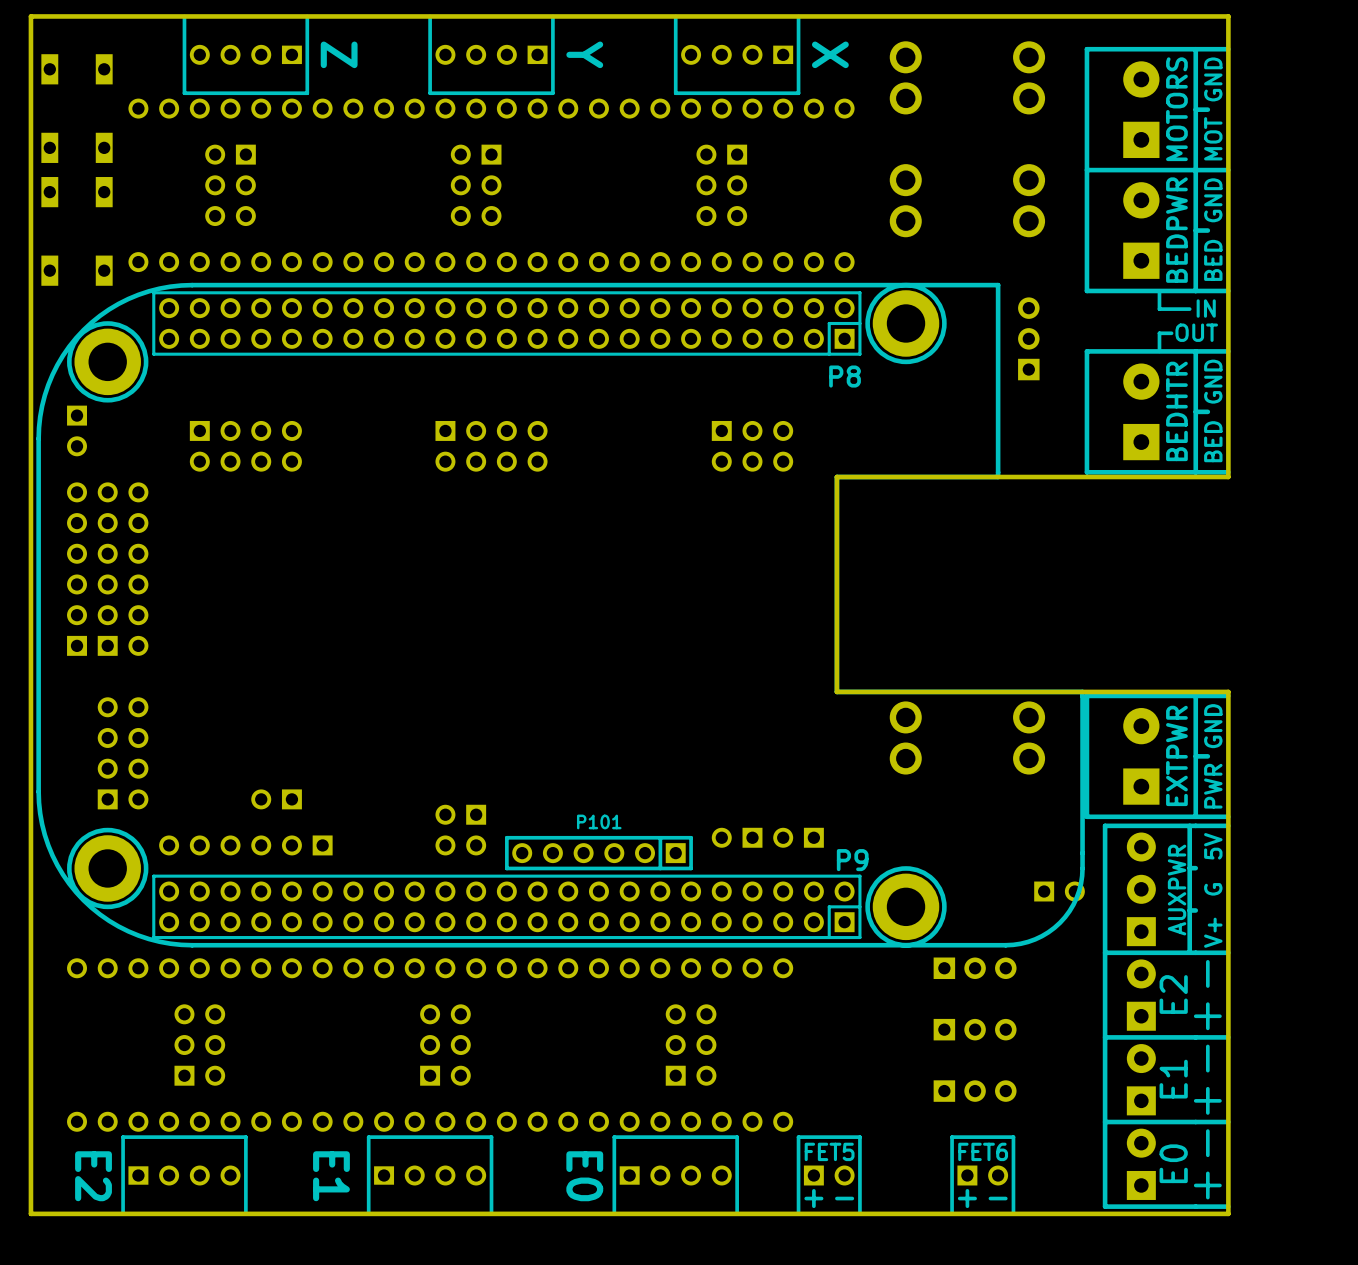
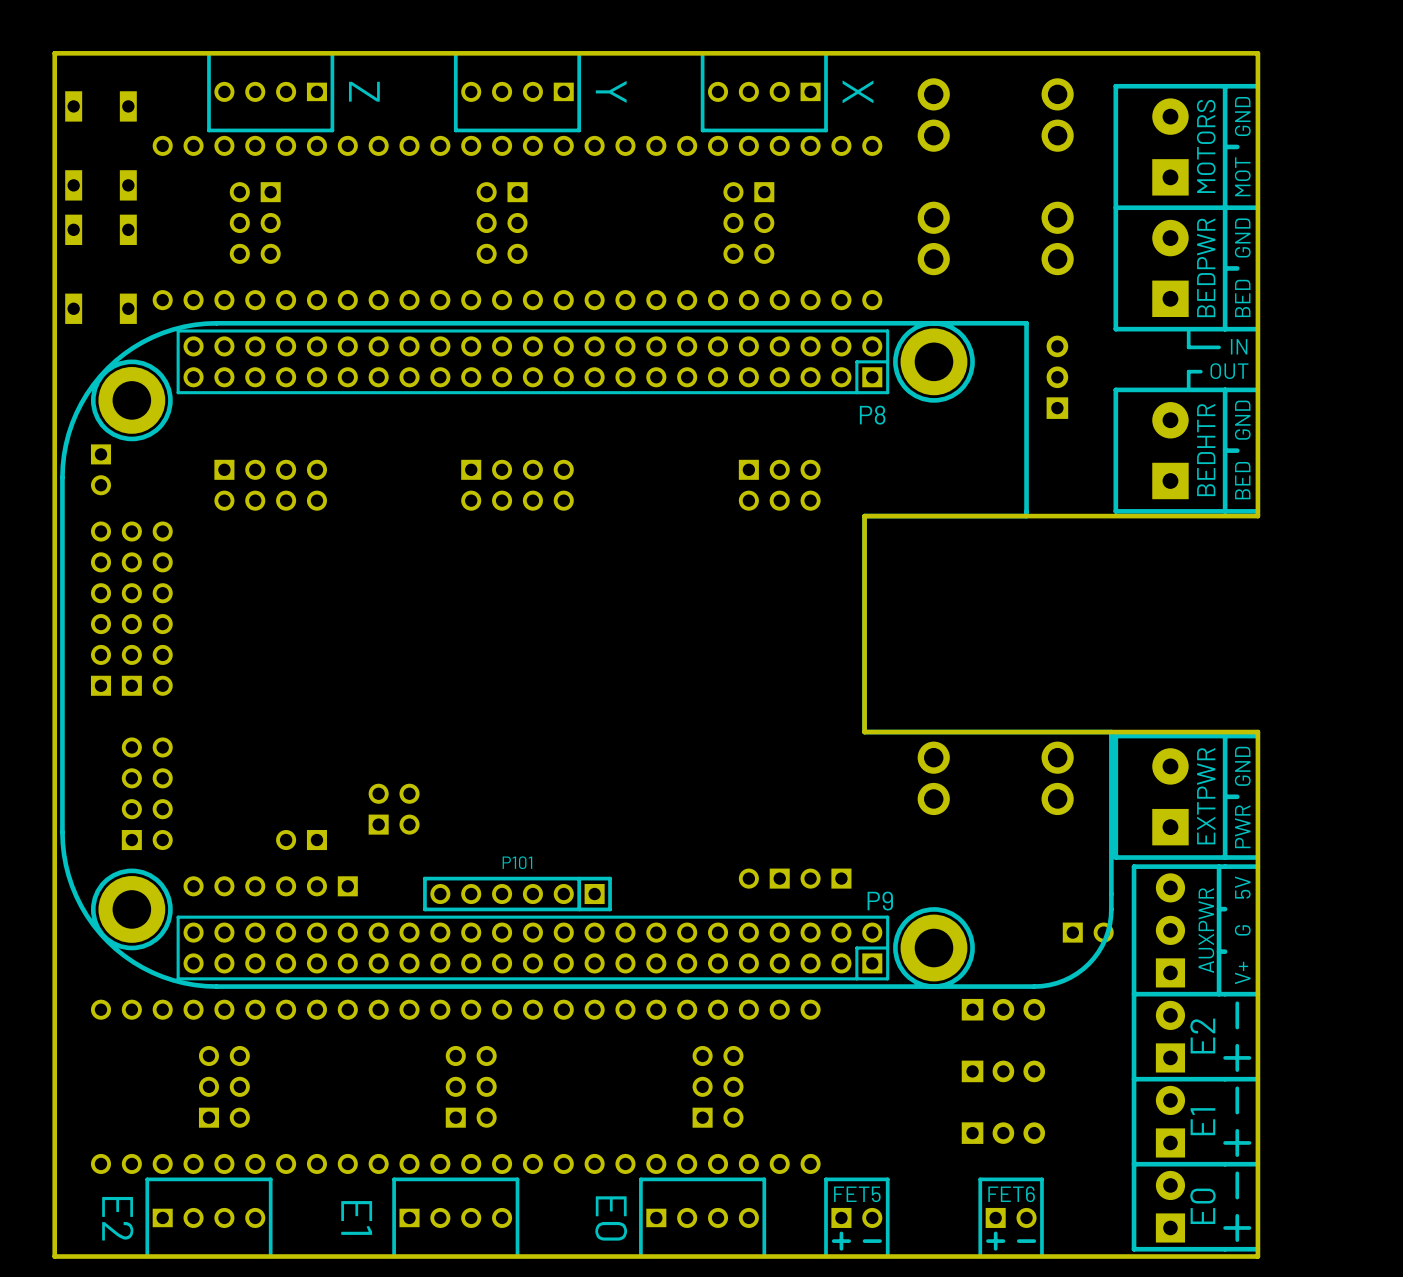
part rotation: 0° (460, 830) -> 180° (394, 809)
part position: (460, 830) -> (394, 809)
P101 position: (598, 853) -> (517, 894)

